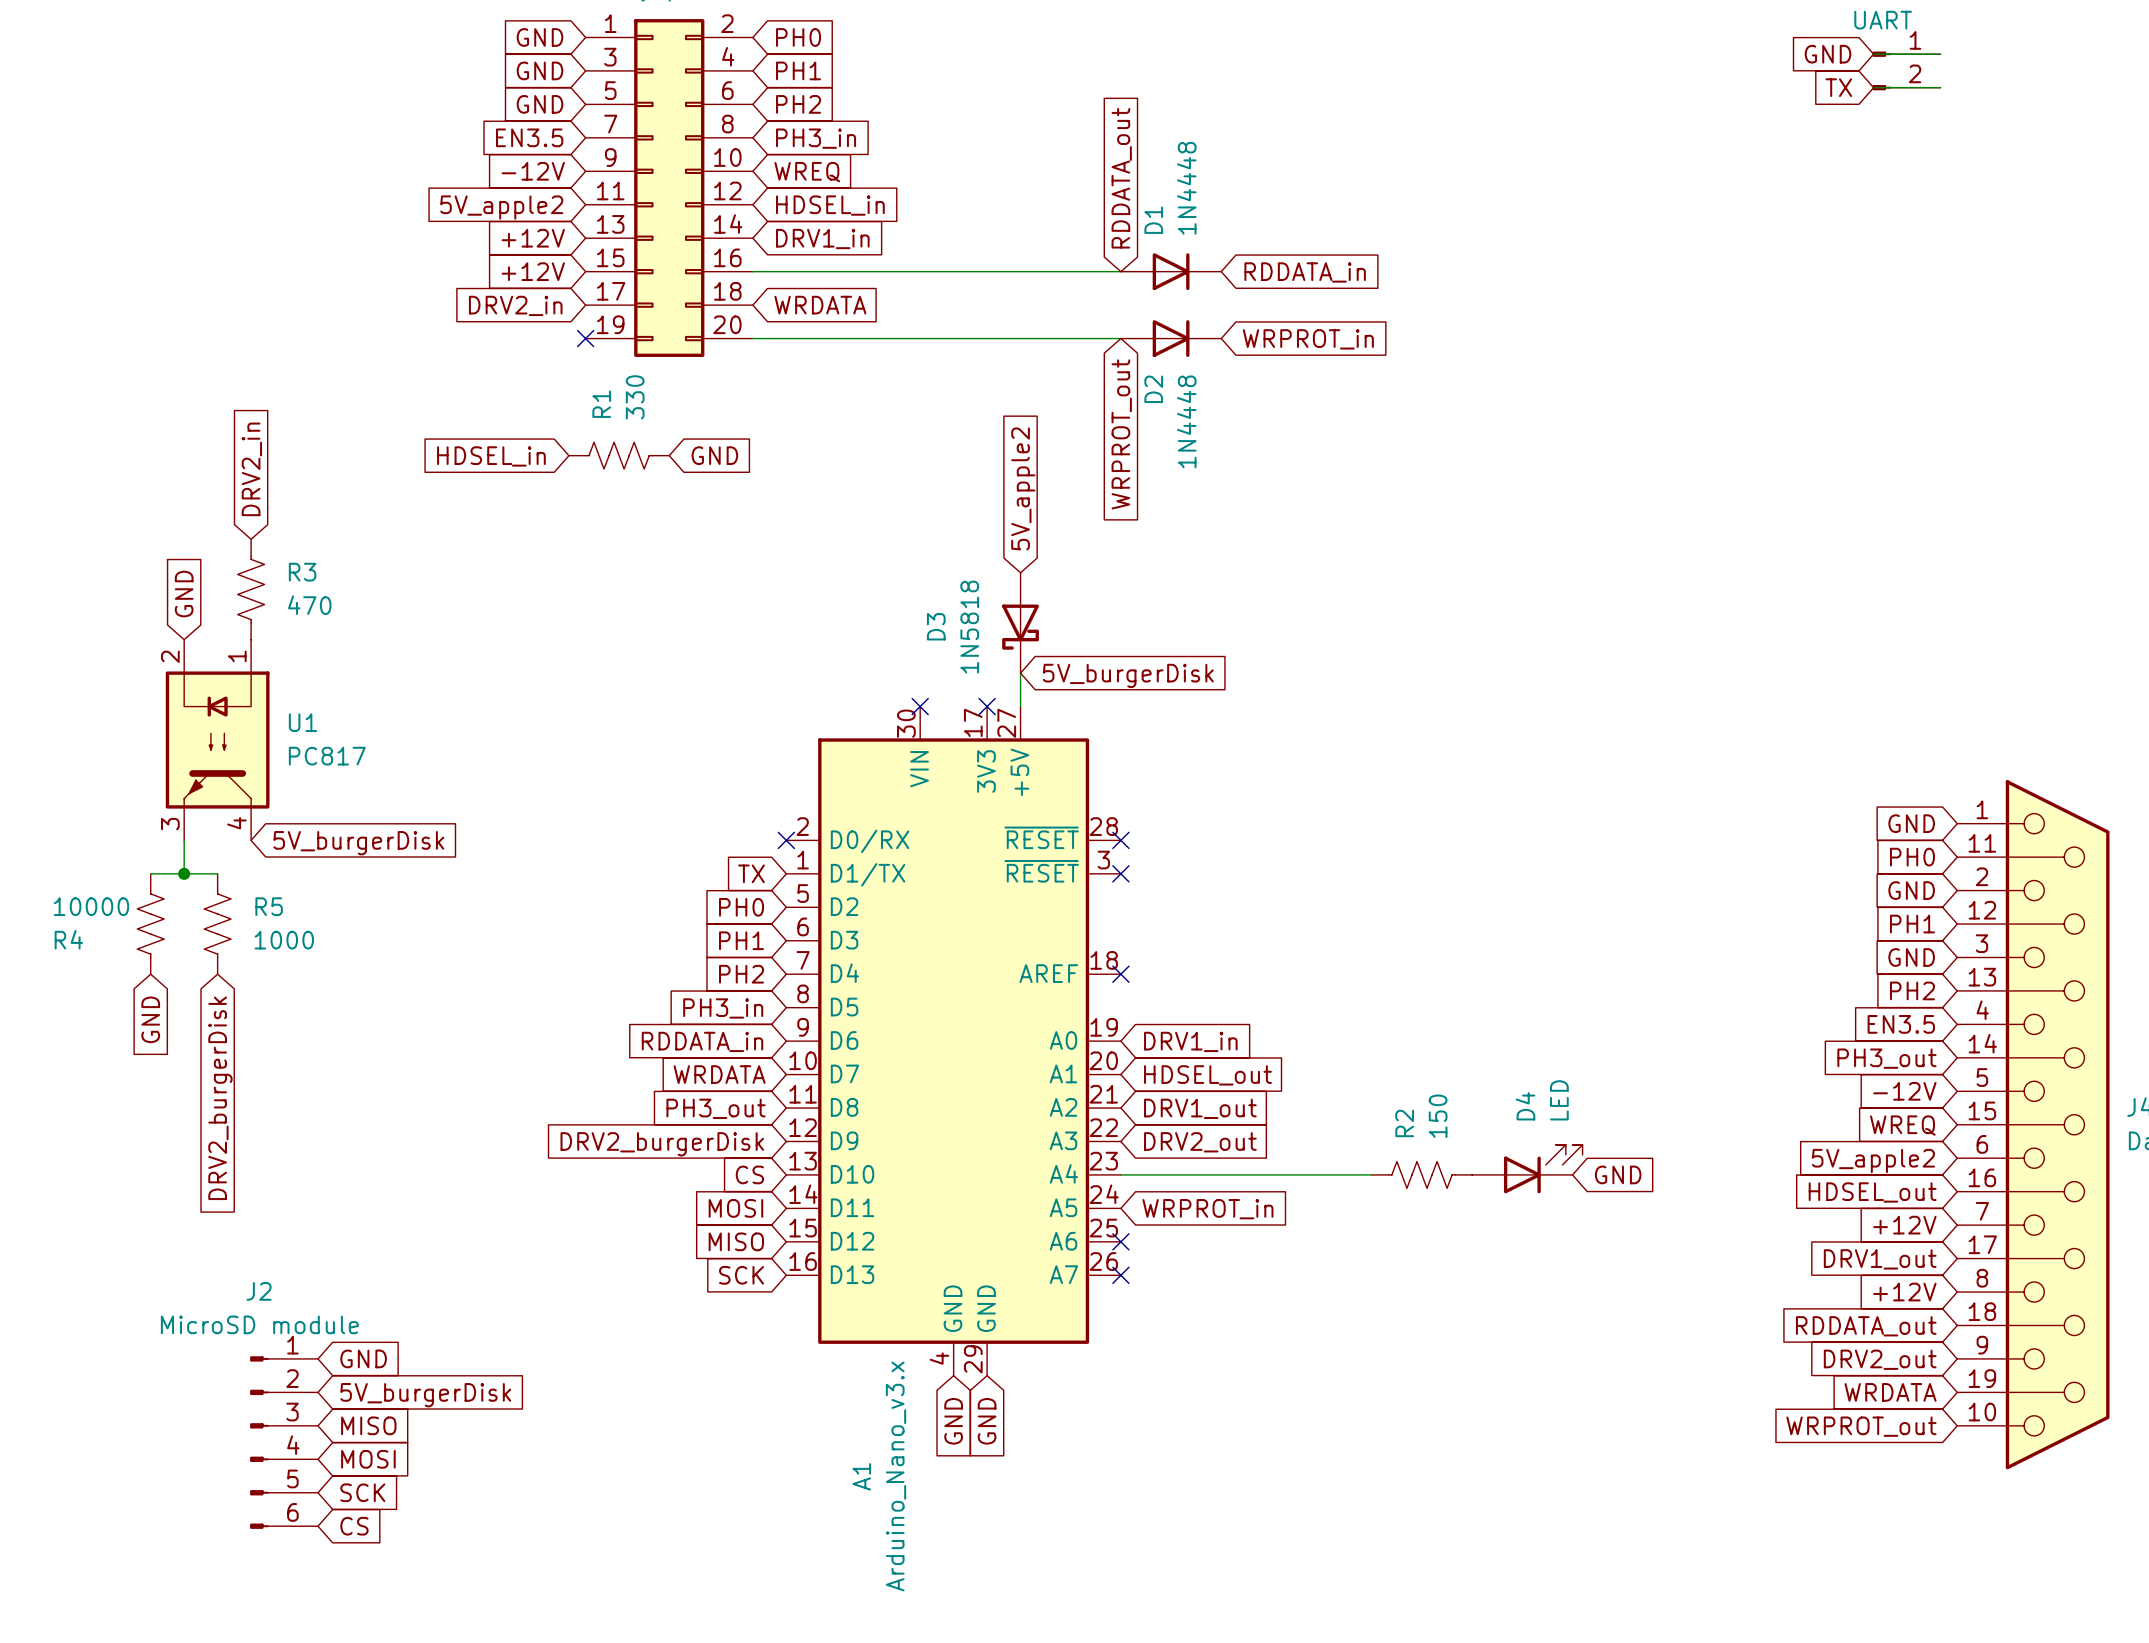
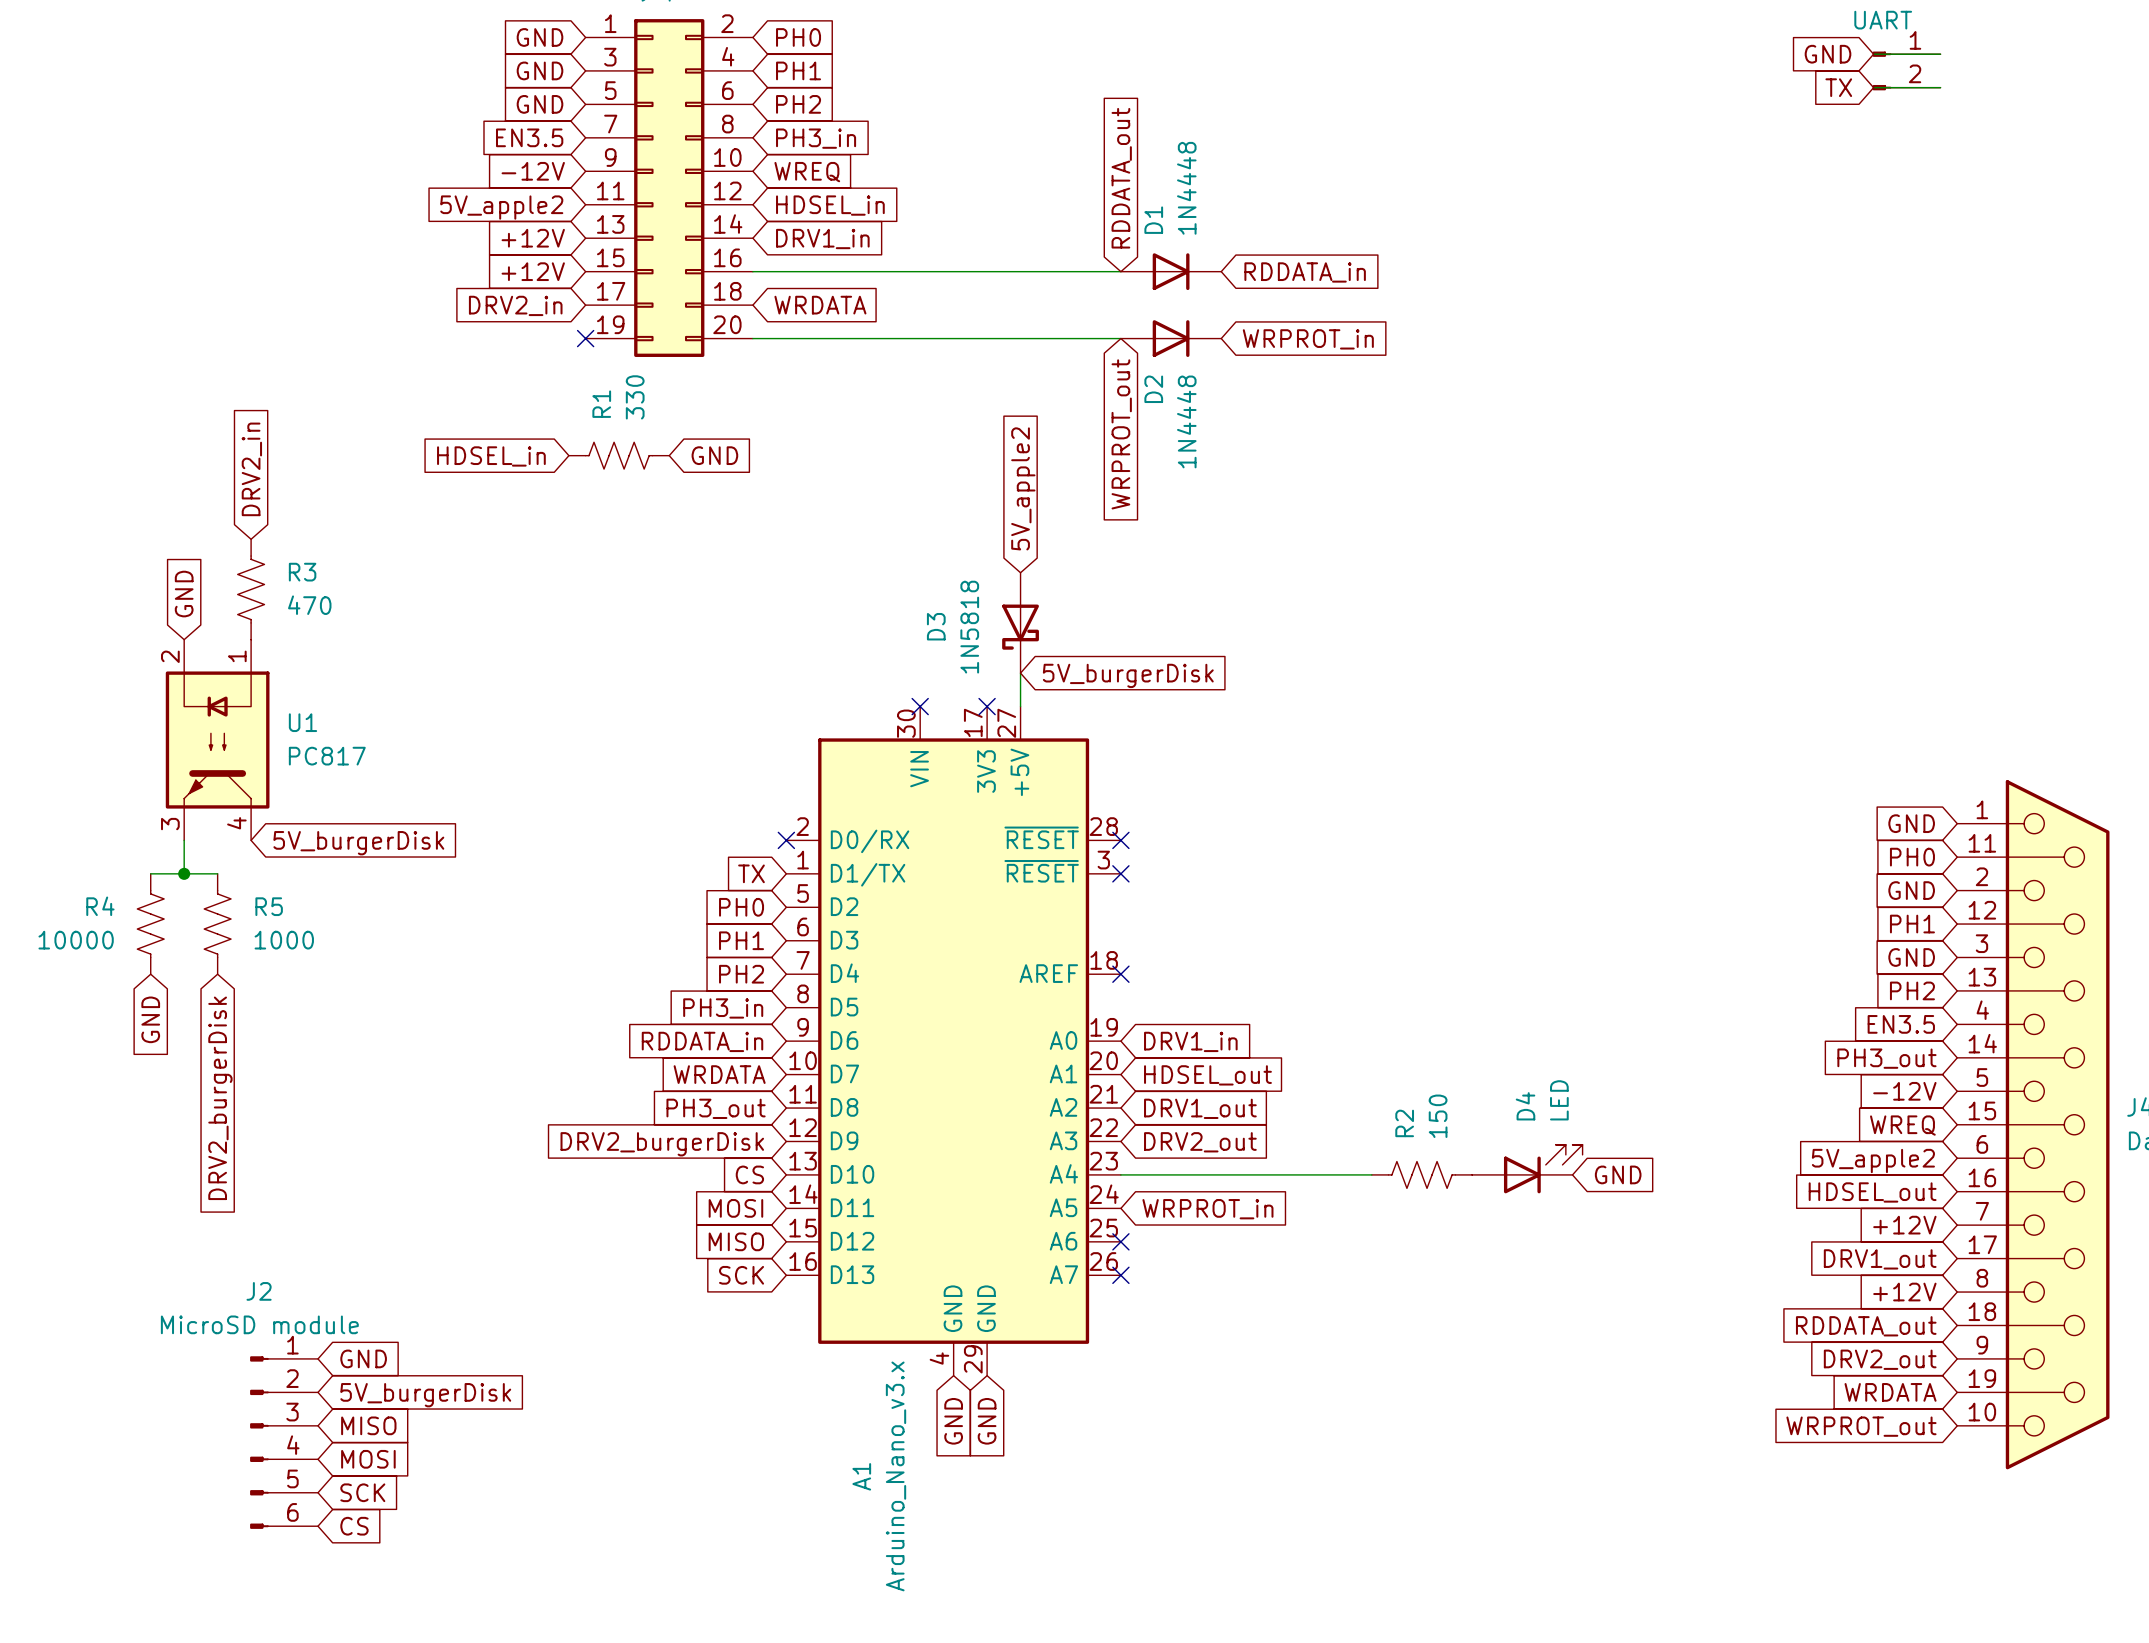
R4 value position: 10000 (91, 906) -> 10000 (76, 940)
R4 name position: R4 (68, 939) -> R4 (100, 906)

